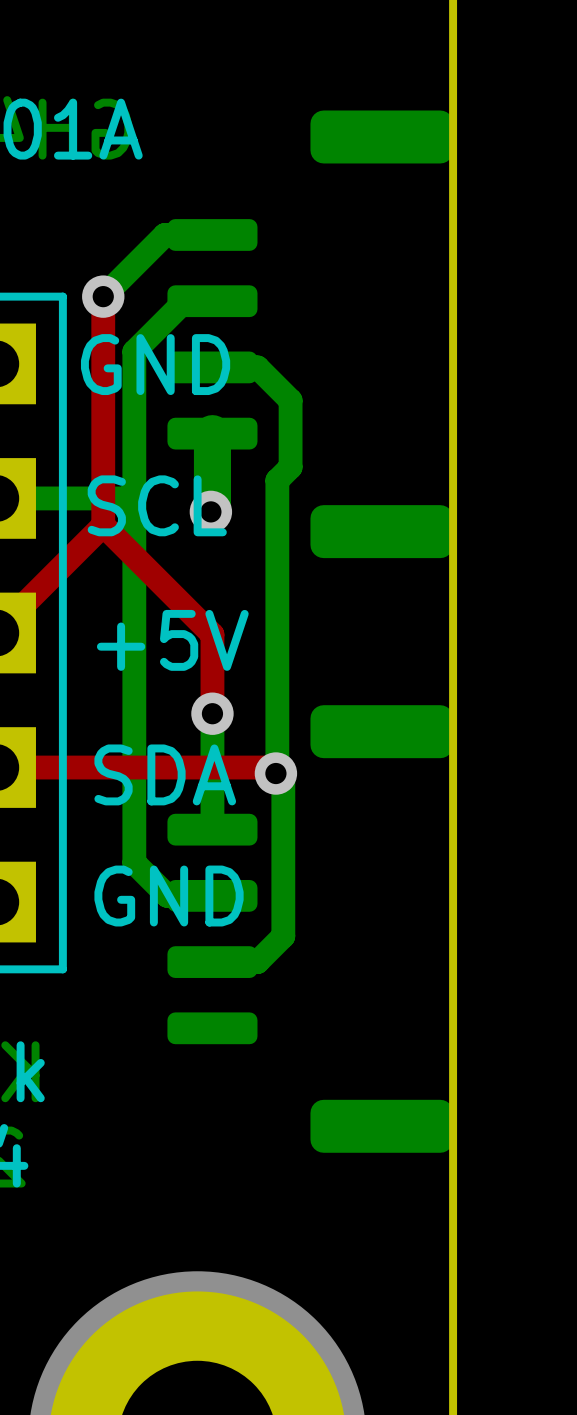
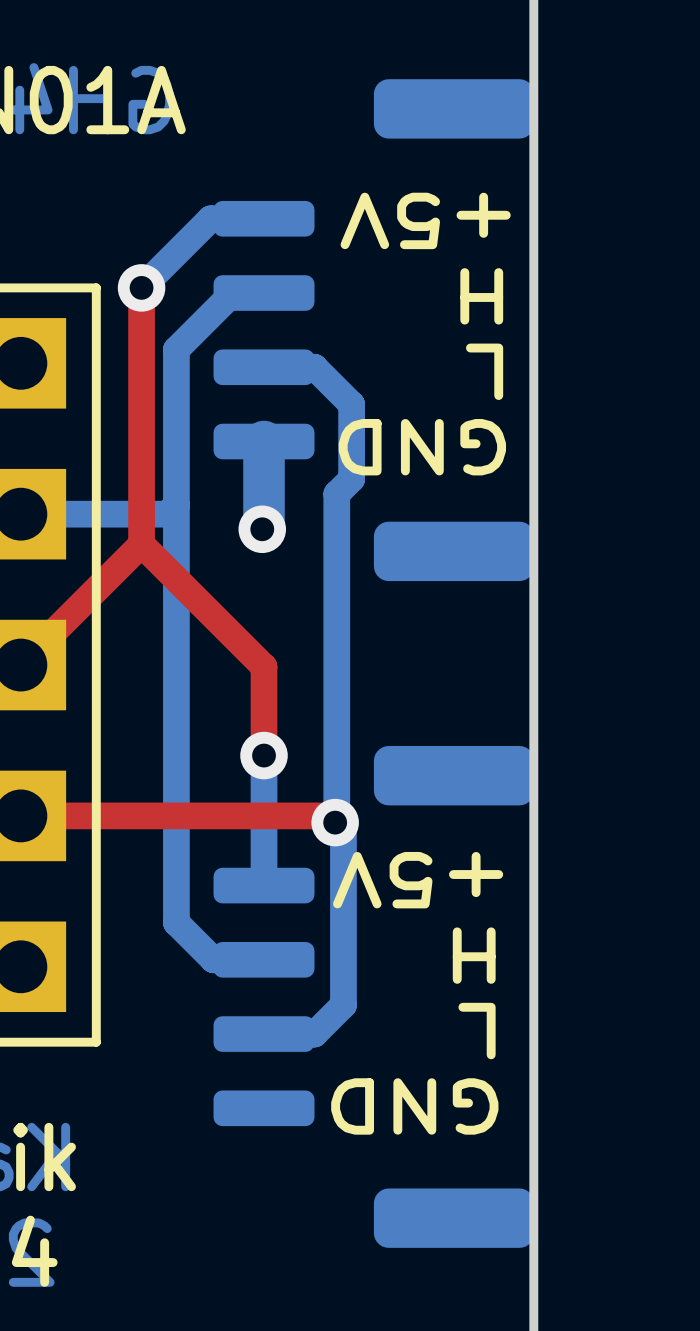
text: none -> +5V (425, 220)
text: none -> H (481, 296)
text rotation: 0° (155, 364) -> 180° (422, 447)
text: none -> L (484, 371)
text: SCL (157, 505) -> none
text: +5V (172, 640) -> none
text: SDA (165, 774) -> none
text: none -> +5V (418, 880)
text: none -> H (474, 955)
text: GND (169, 896) -> none
text: none -> L (477, 1031)
text: none -> GND (414, 1106)

